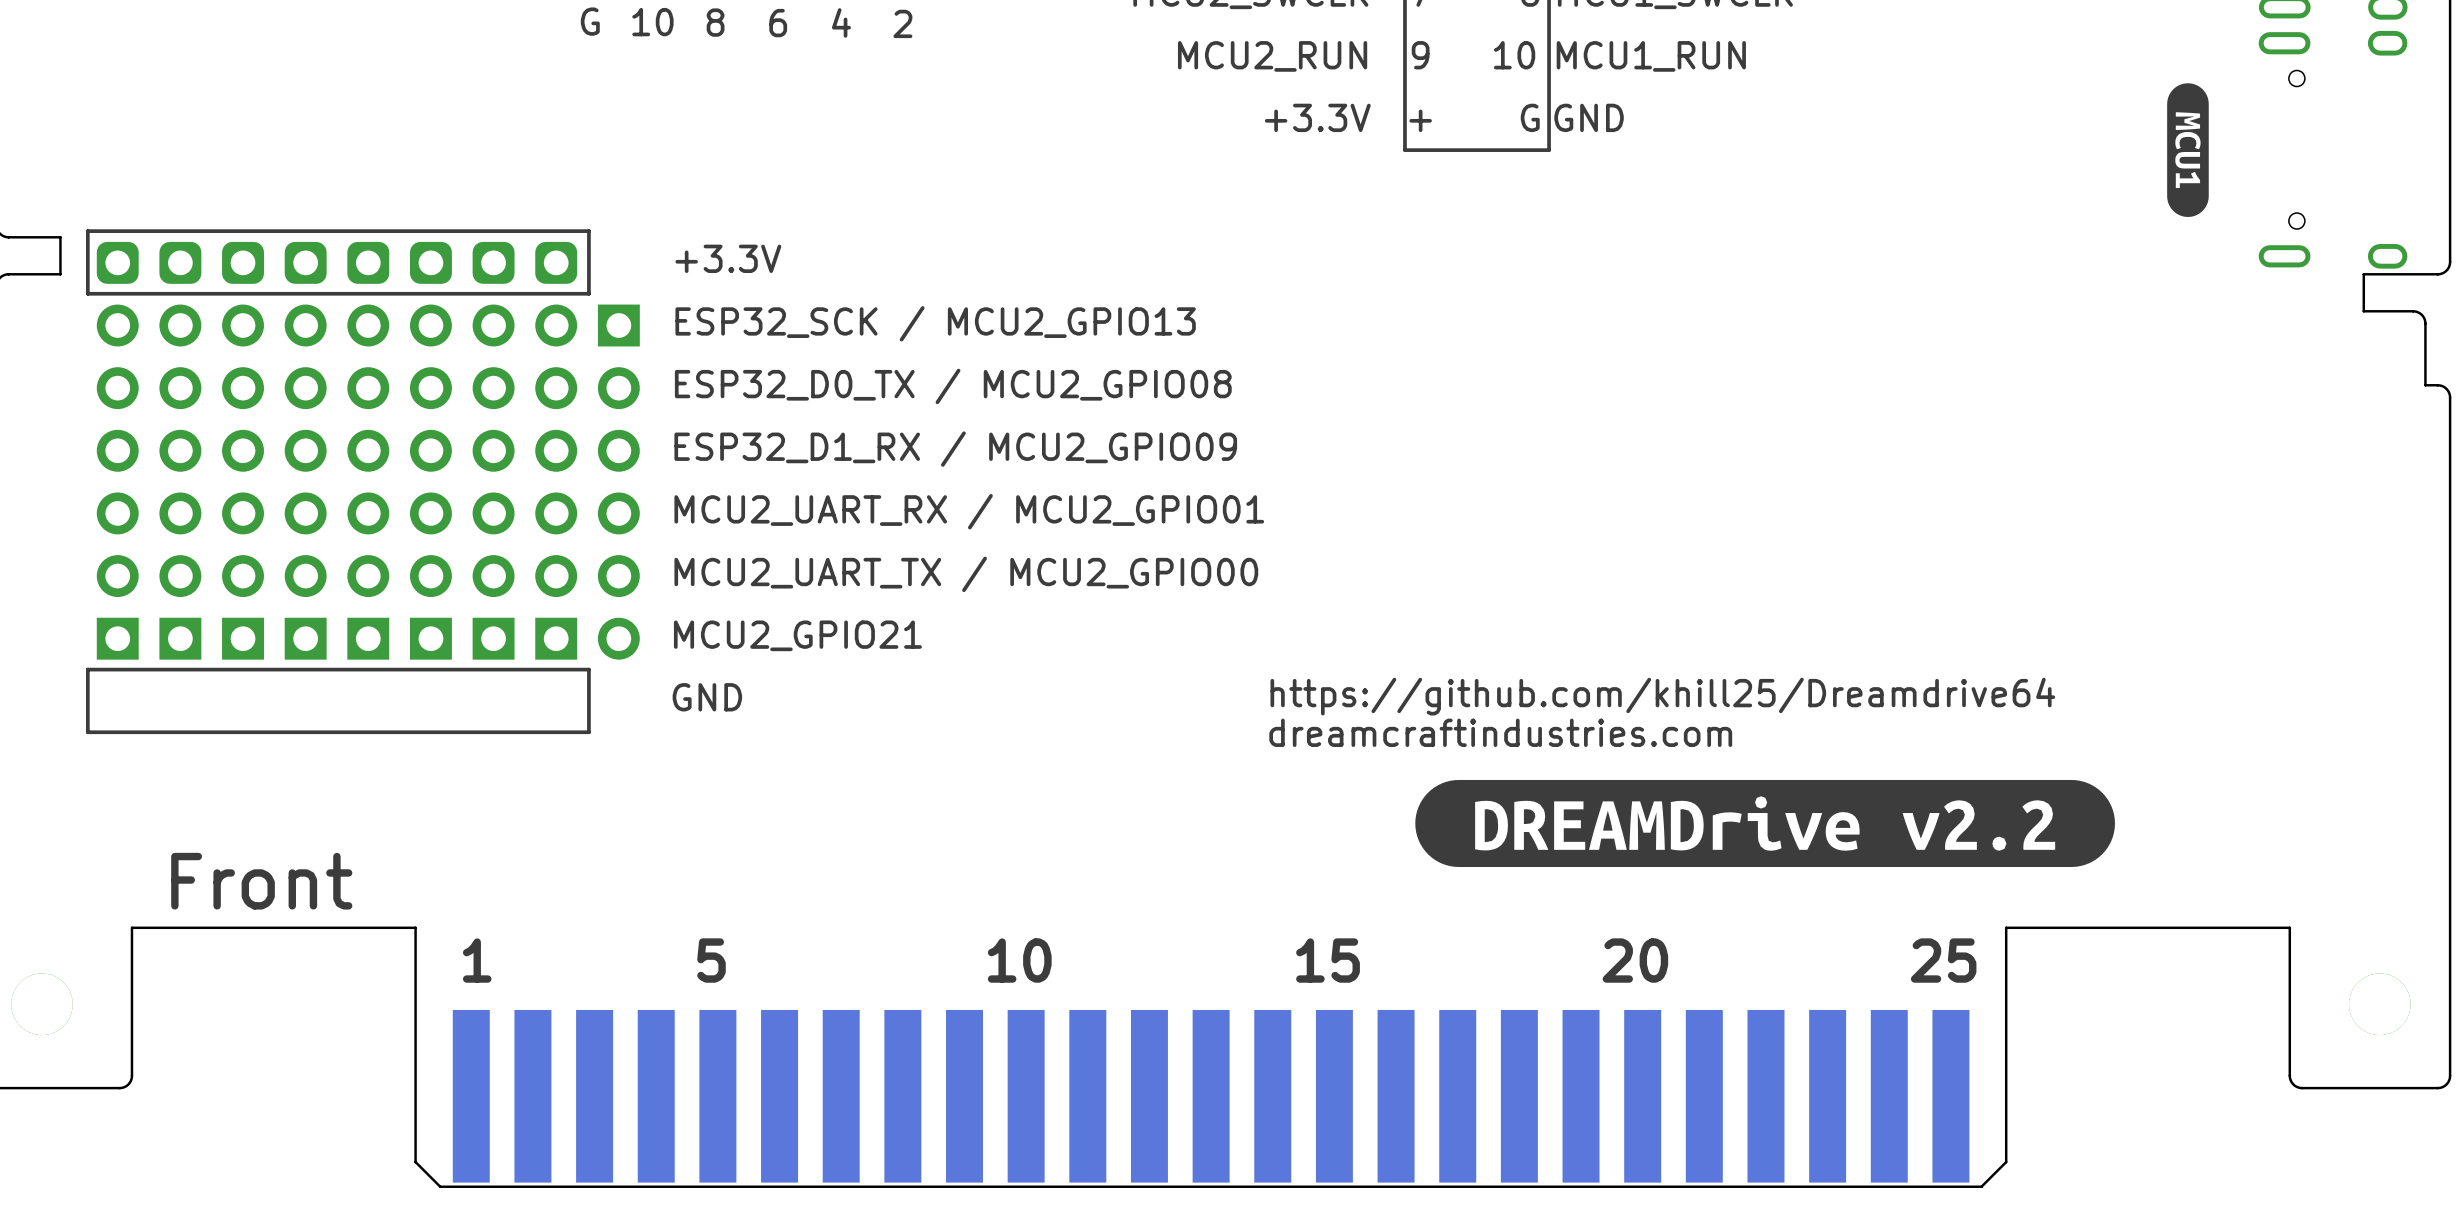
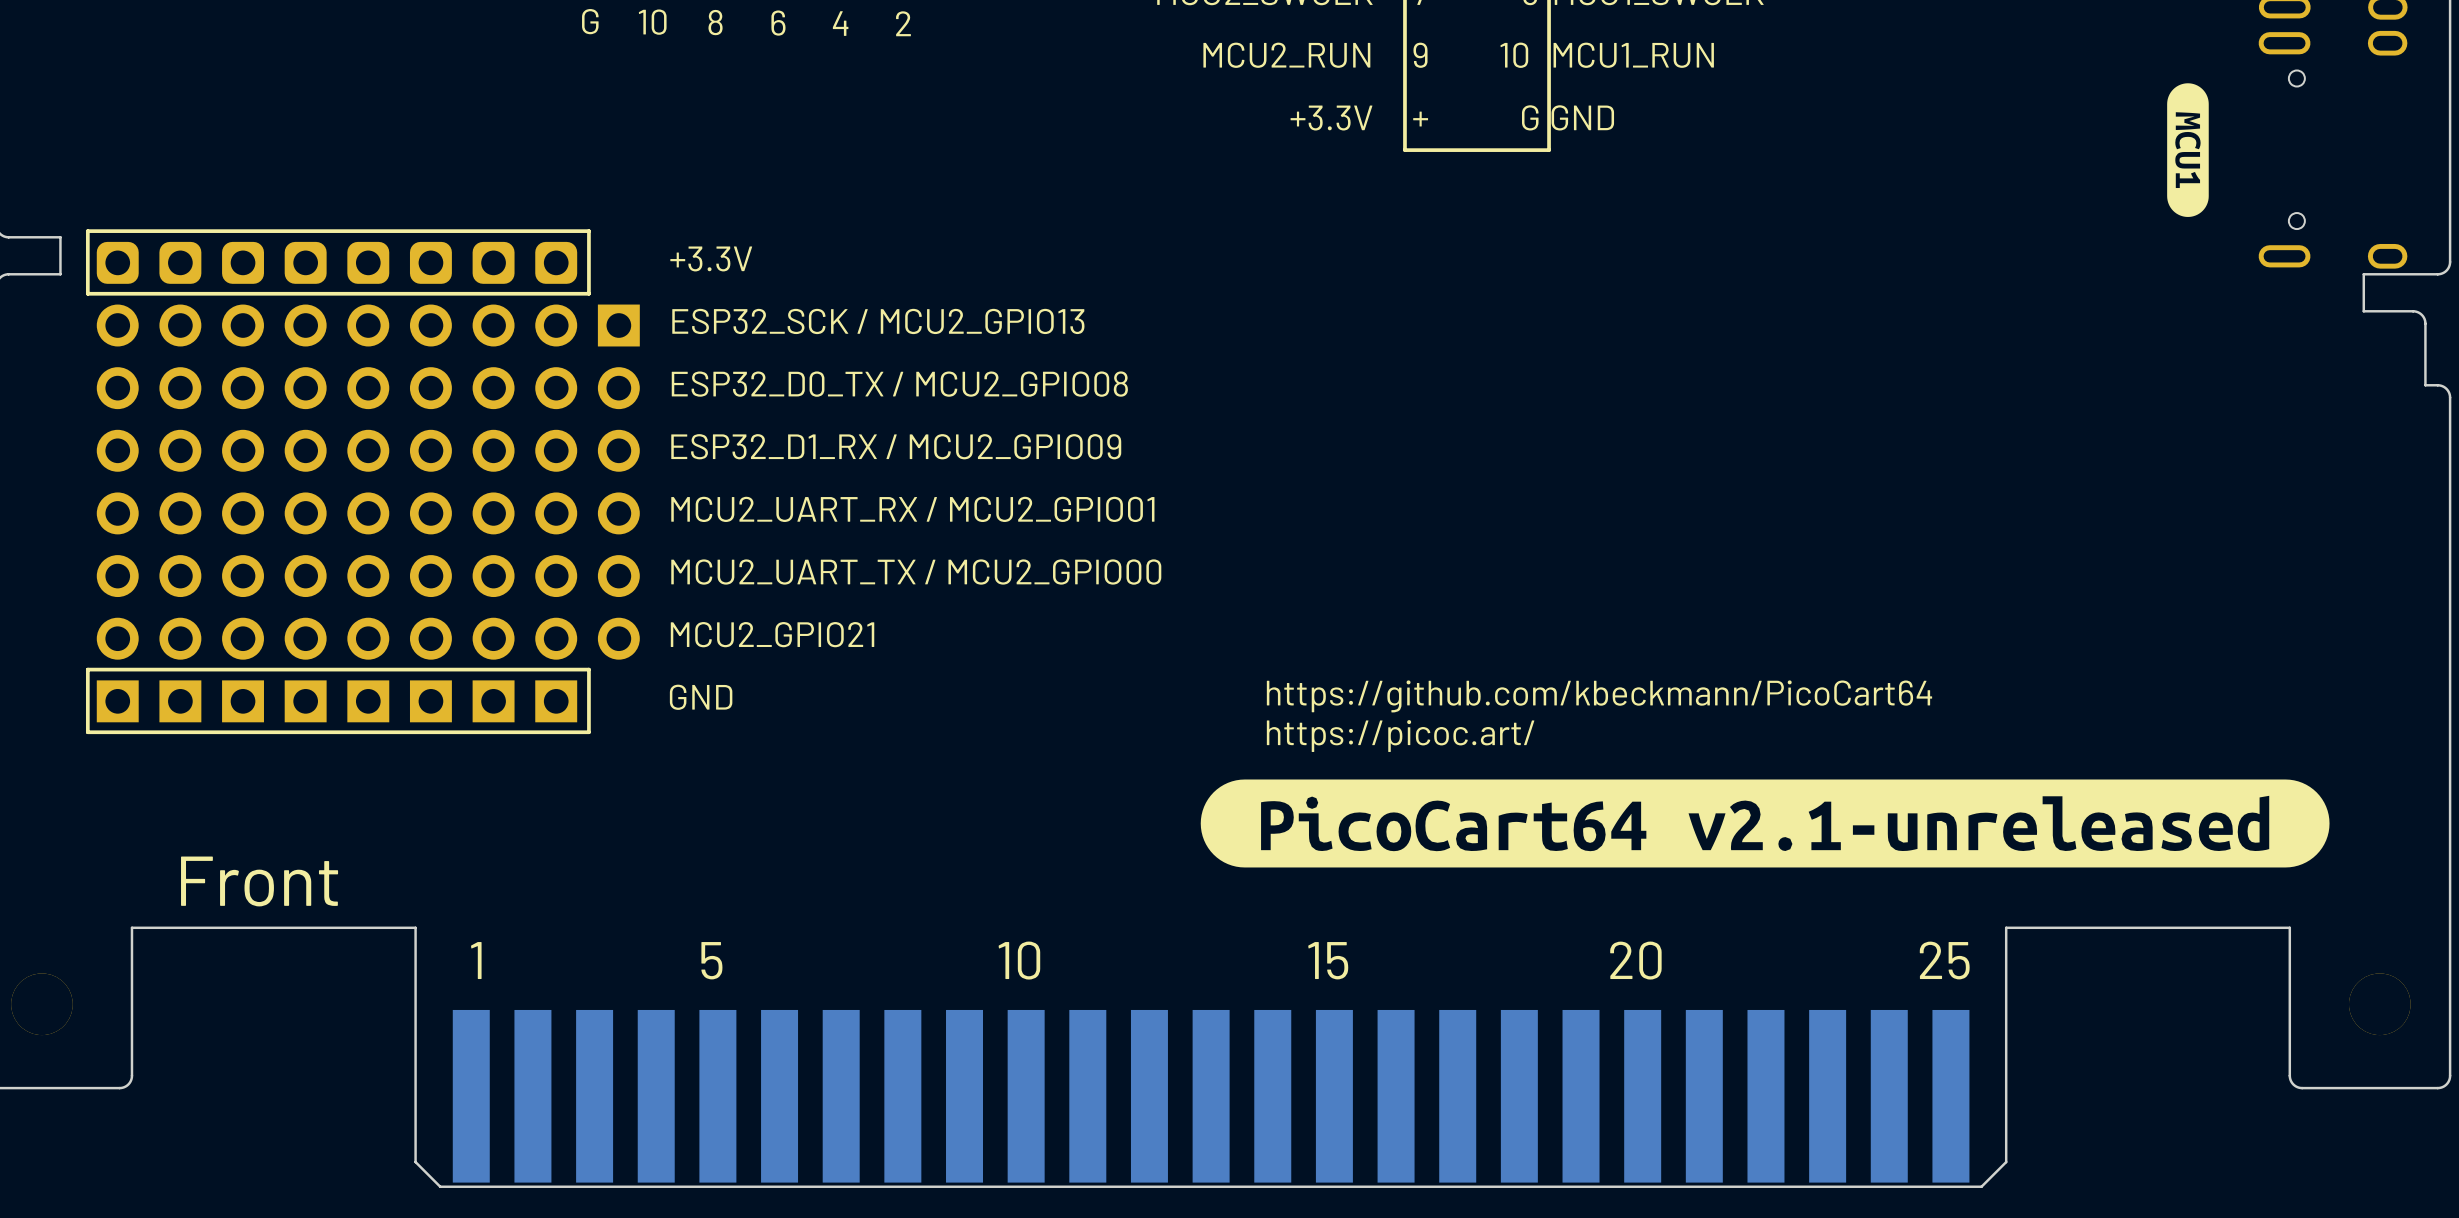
part: (336, 450) -> none
part: none -> (336, 482)
text: https://github.com/khill25/Dreamdrive64 (1662, 696) -> https://github.com/kbeckmann/PicoCart64 (1599, 696)
text: dreamcraftindustries.com (1500, 732) -> https://picoc.art/ (1400, 736)
drawing shape: [1415, 779, 2115, 868] -> [1200, 779, 2330, 868]

